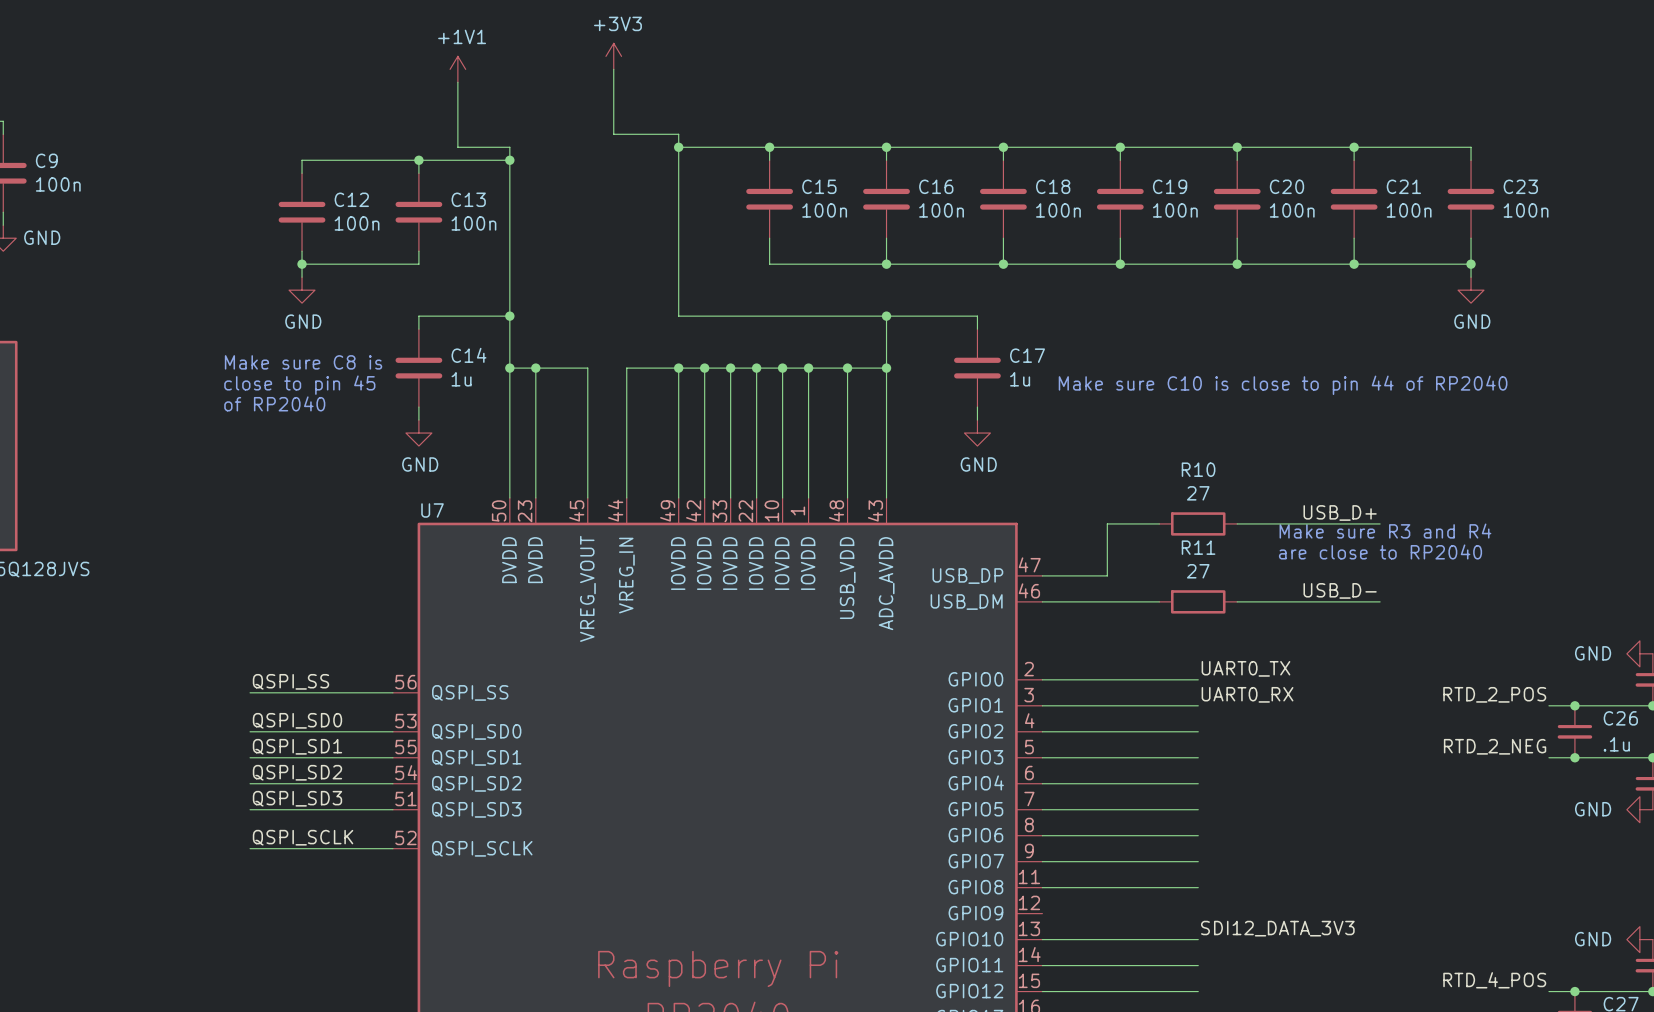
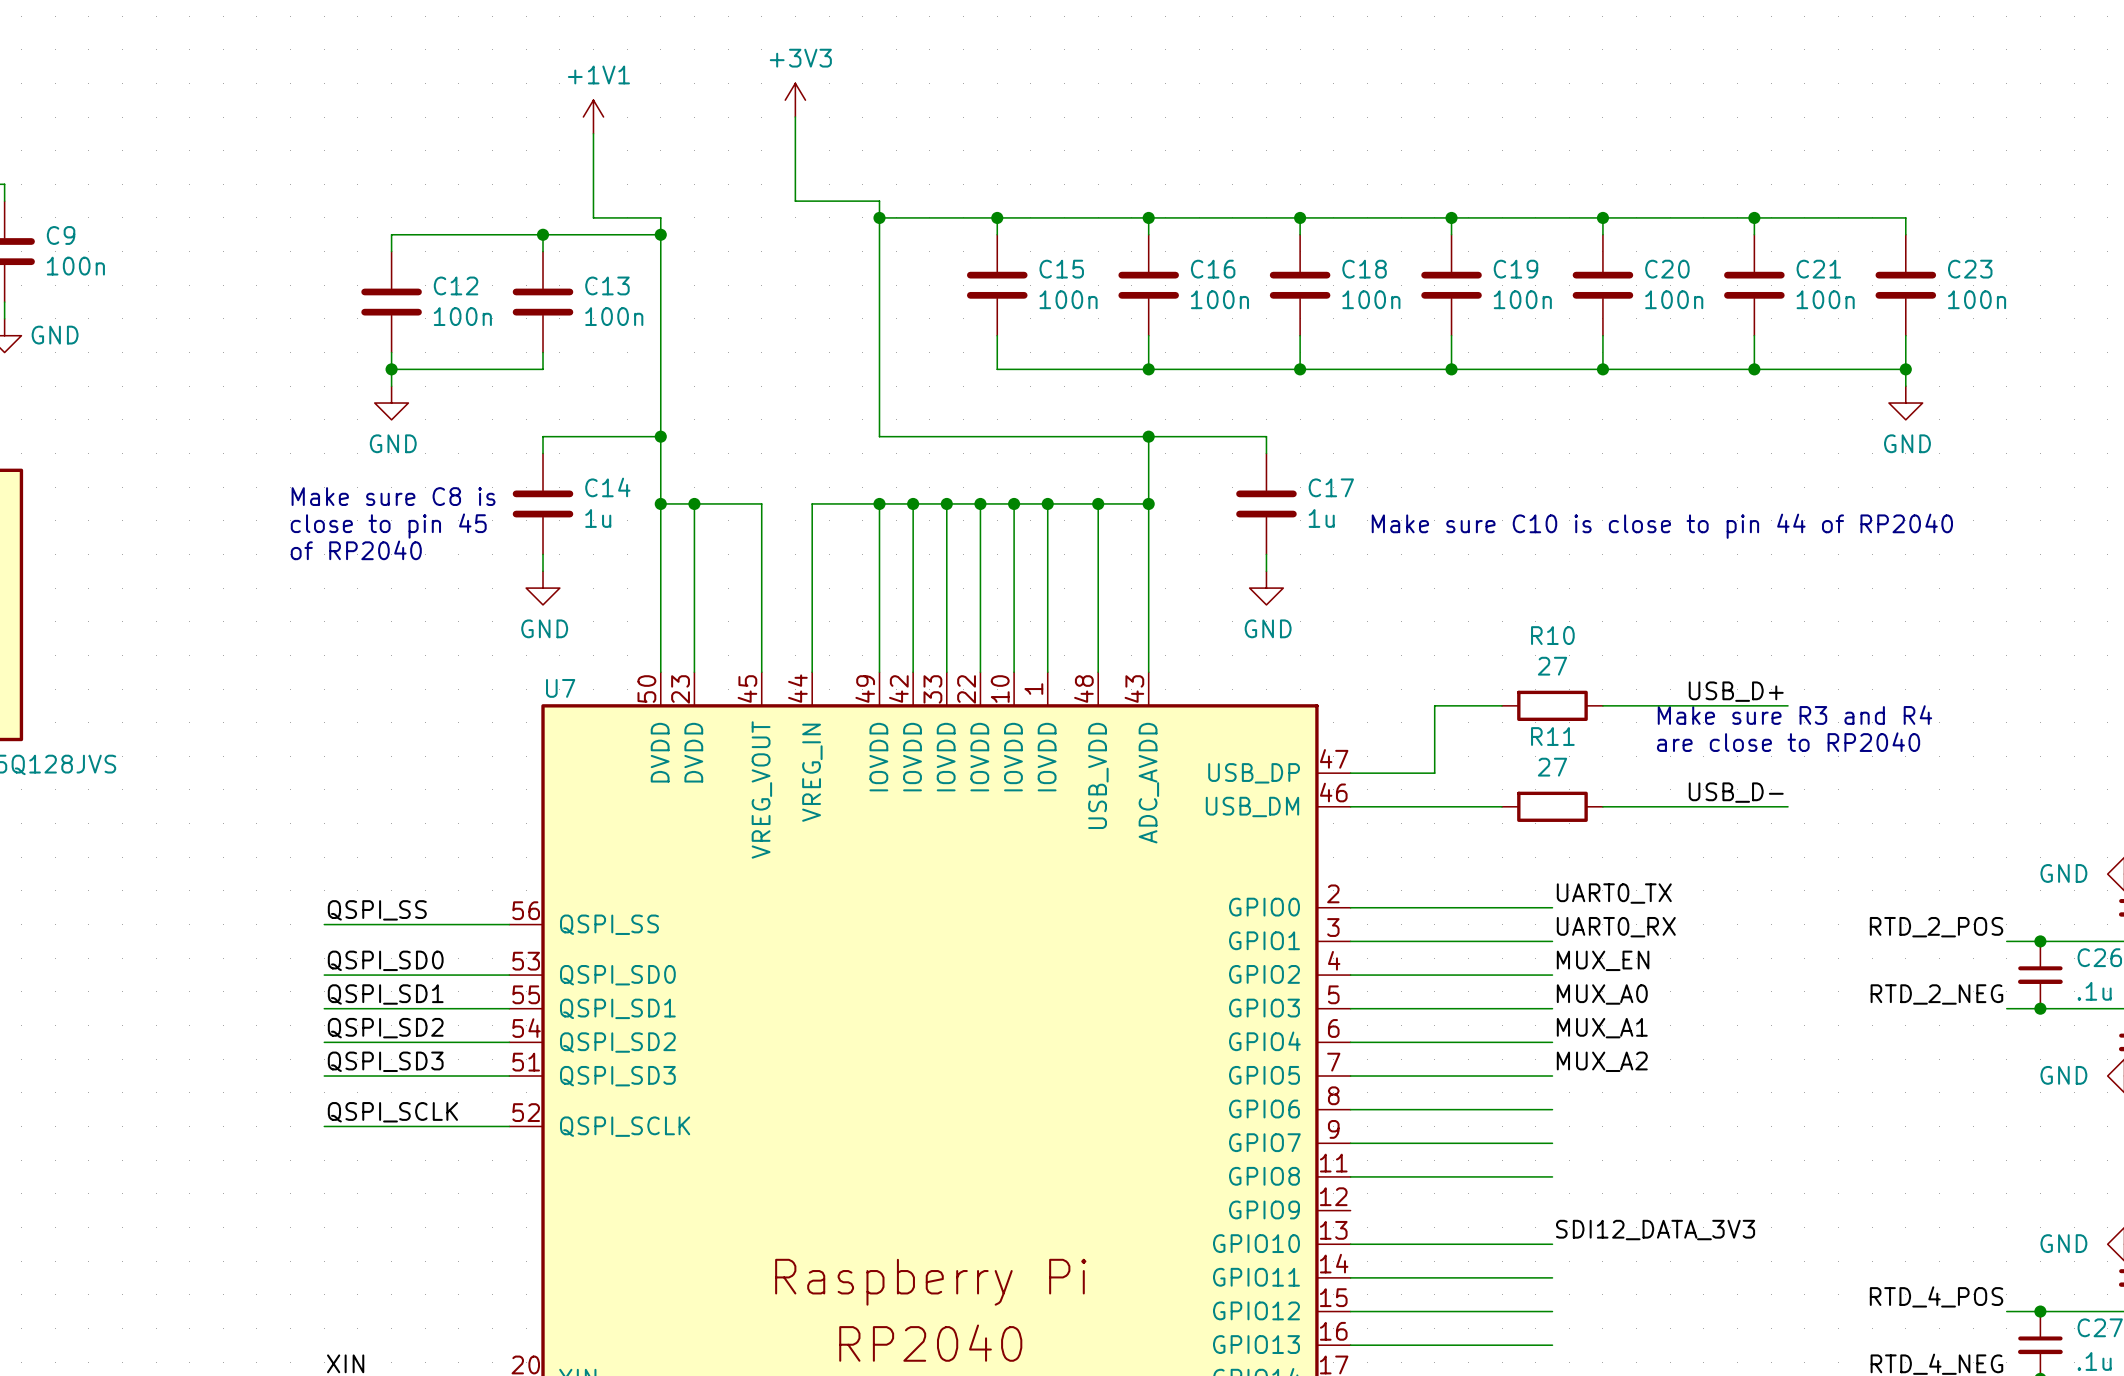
label: none -> MUX_EN (1603, 960)
label: none -> MUX_A0 (1602, 994)
label: none -> MUX_A1 (1602, 1028)
label: none -> MUX_A2 (1602, 1061)

